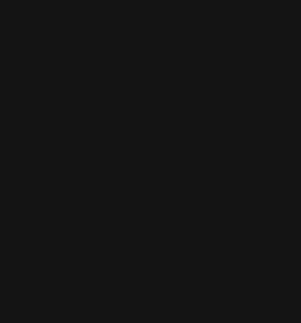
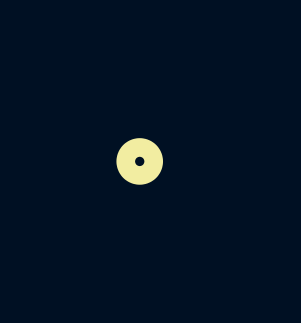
part: none -> (139, 161)

